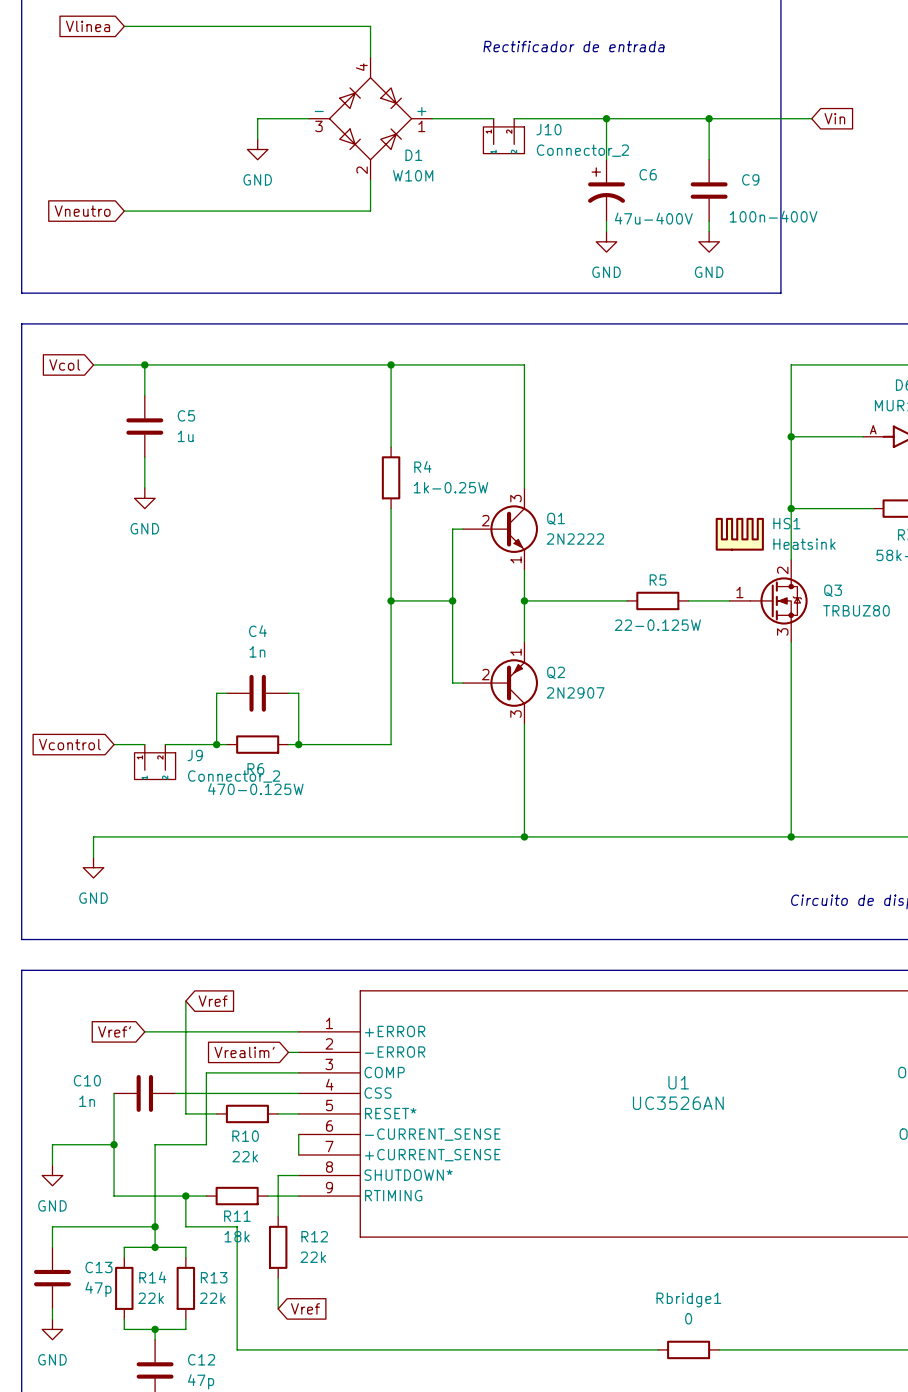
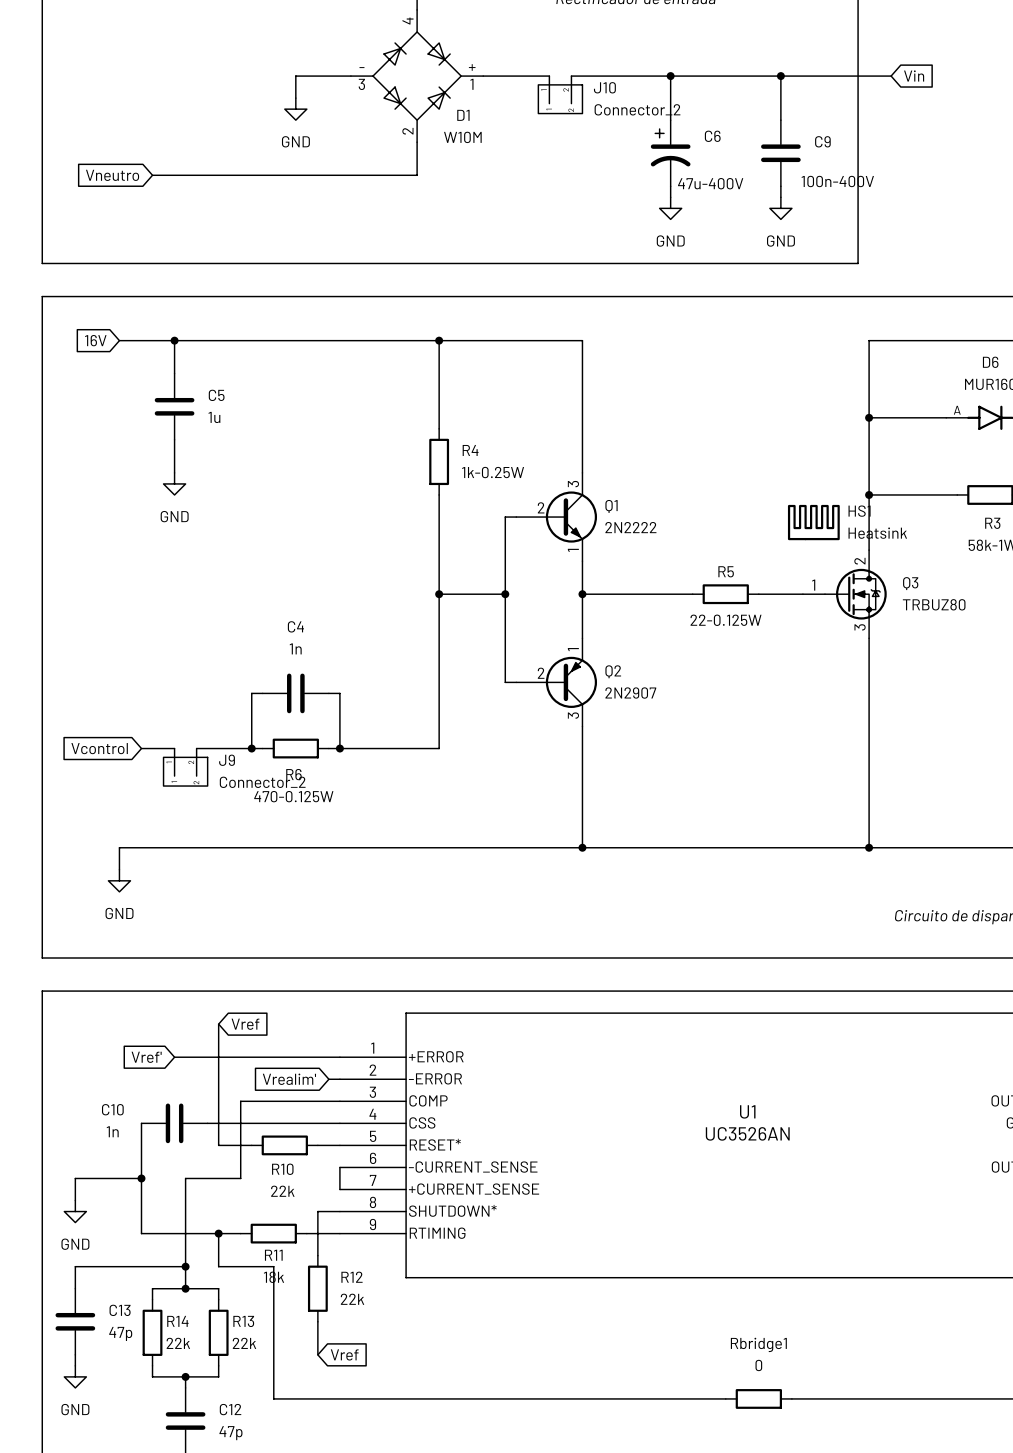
global label: Vcol (64, 364) -> 16V (95, 340)

